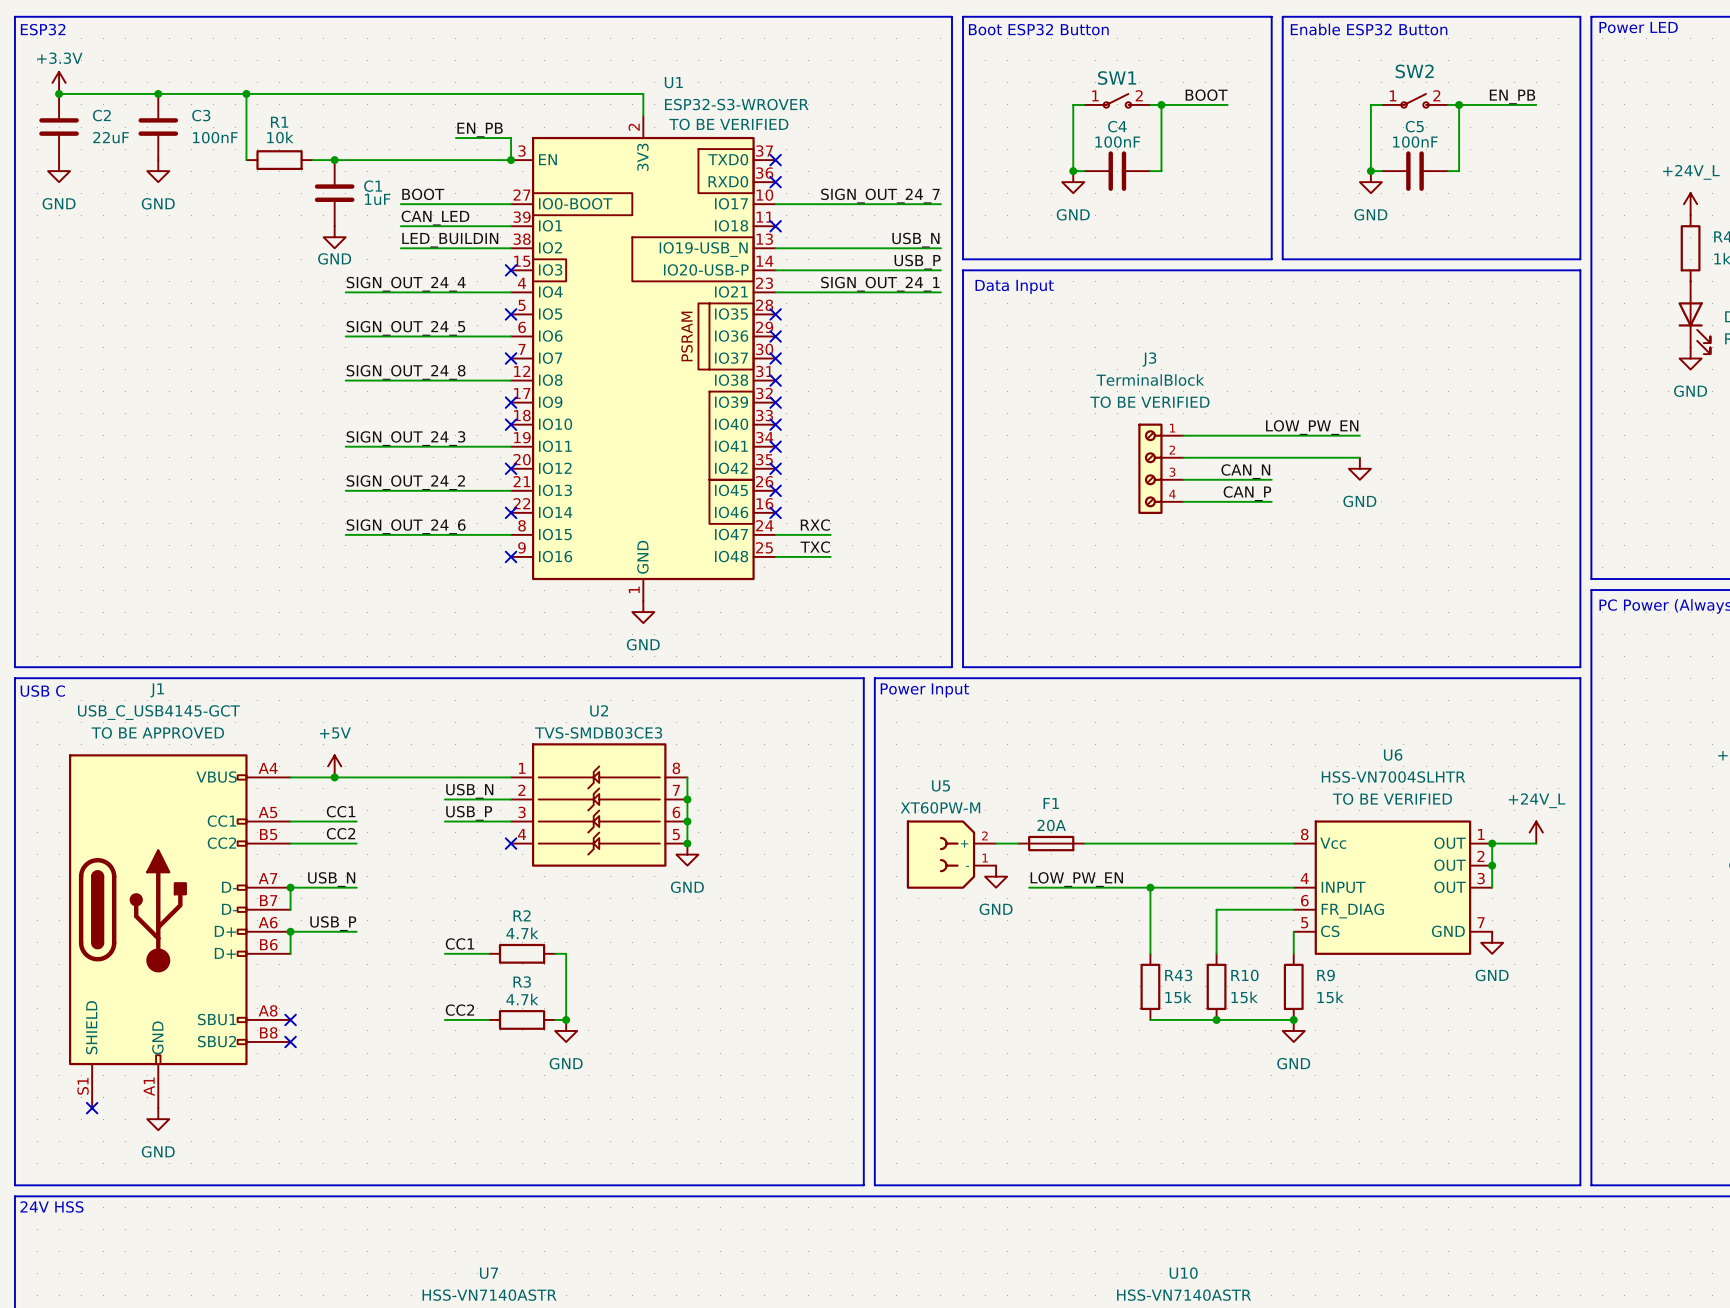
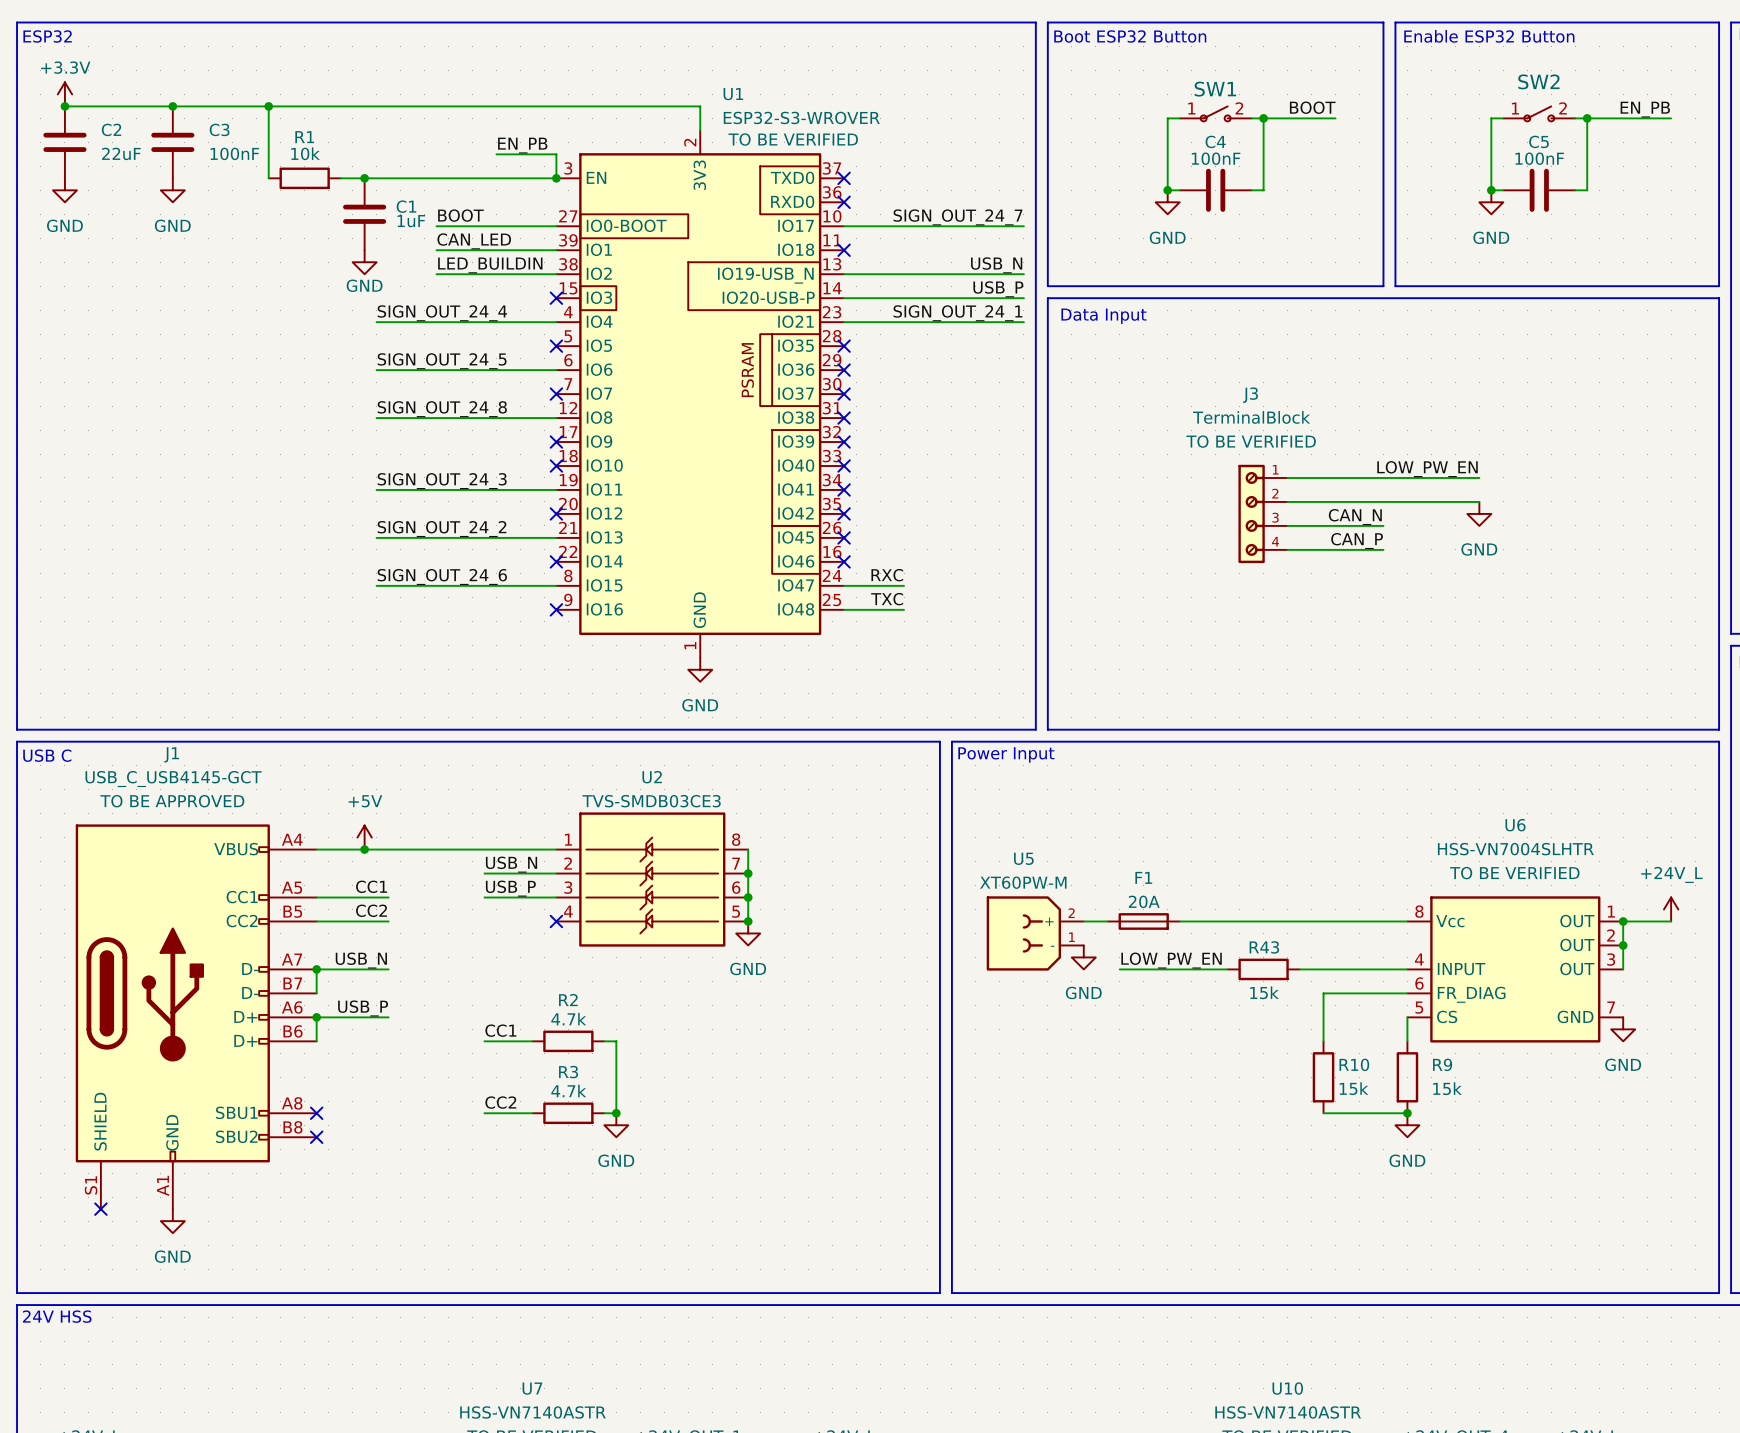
wire: (1128, 887) (1194, 887) -> none
wire: (1150, 887) (1150, 953) -> none
junction: (1150, 887) -> none
R43 name position: R43 (1178, 975) -> R43 (1264, 947)
R43 rotation: 0° (1150, 986) -> 90° clockwise (1263, 969)
R43 position: (1150, 986) -> (1263, 969)
wire: (1150, 1019) (1216, 1019) -> none
junction: (1216, 1019) -> none

